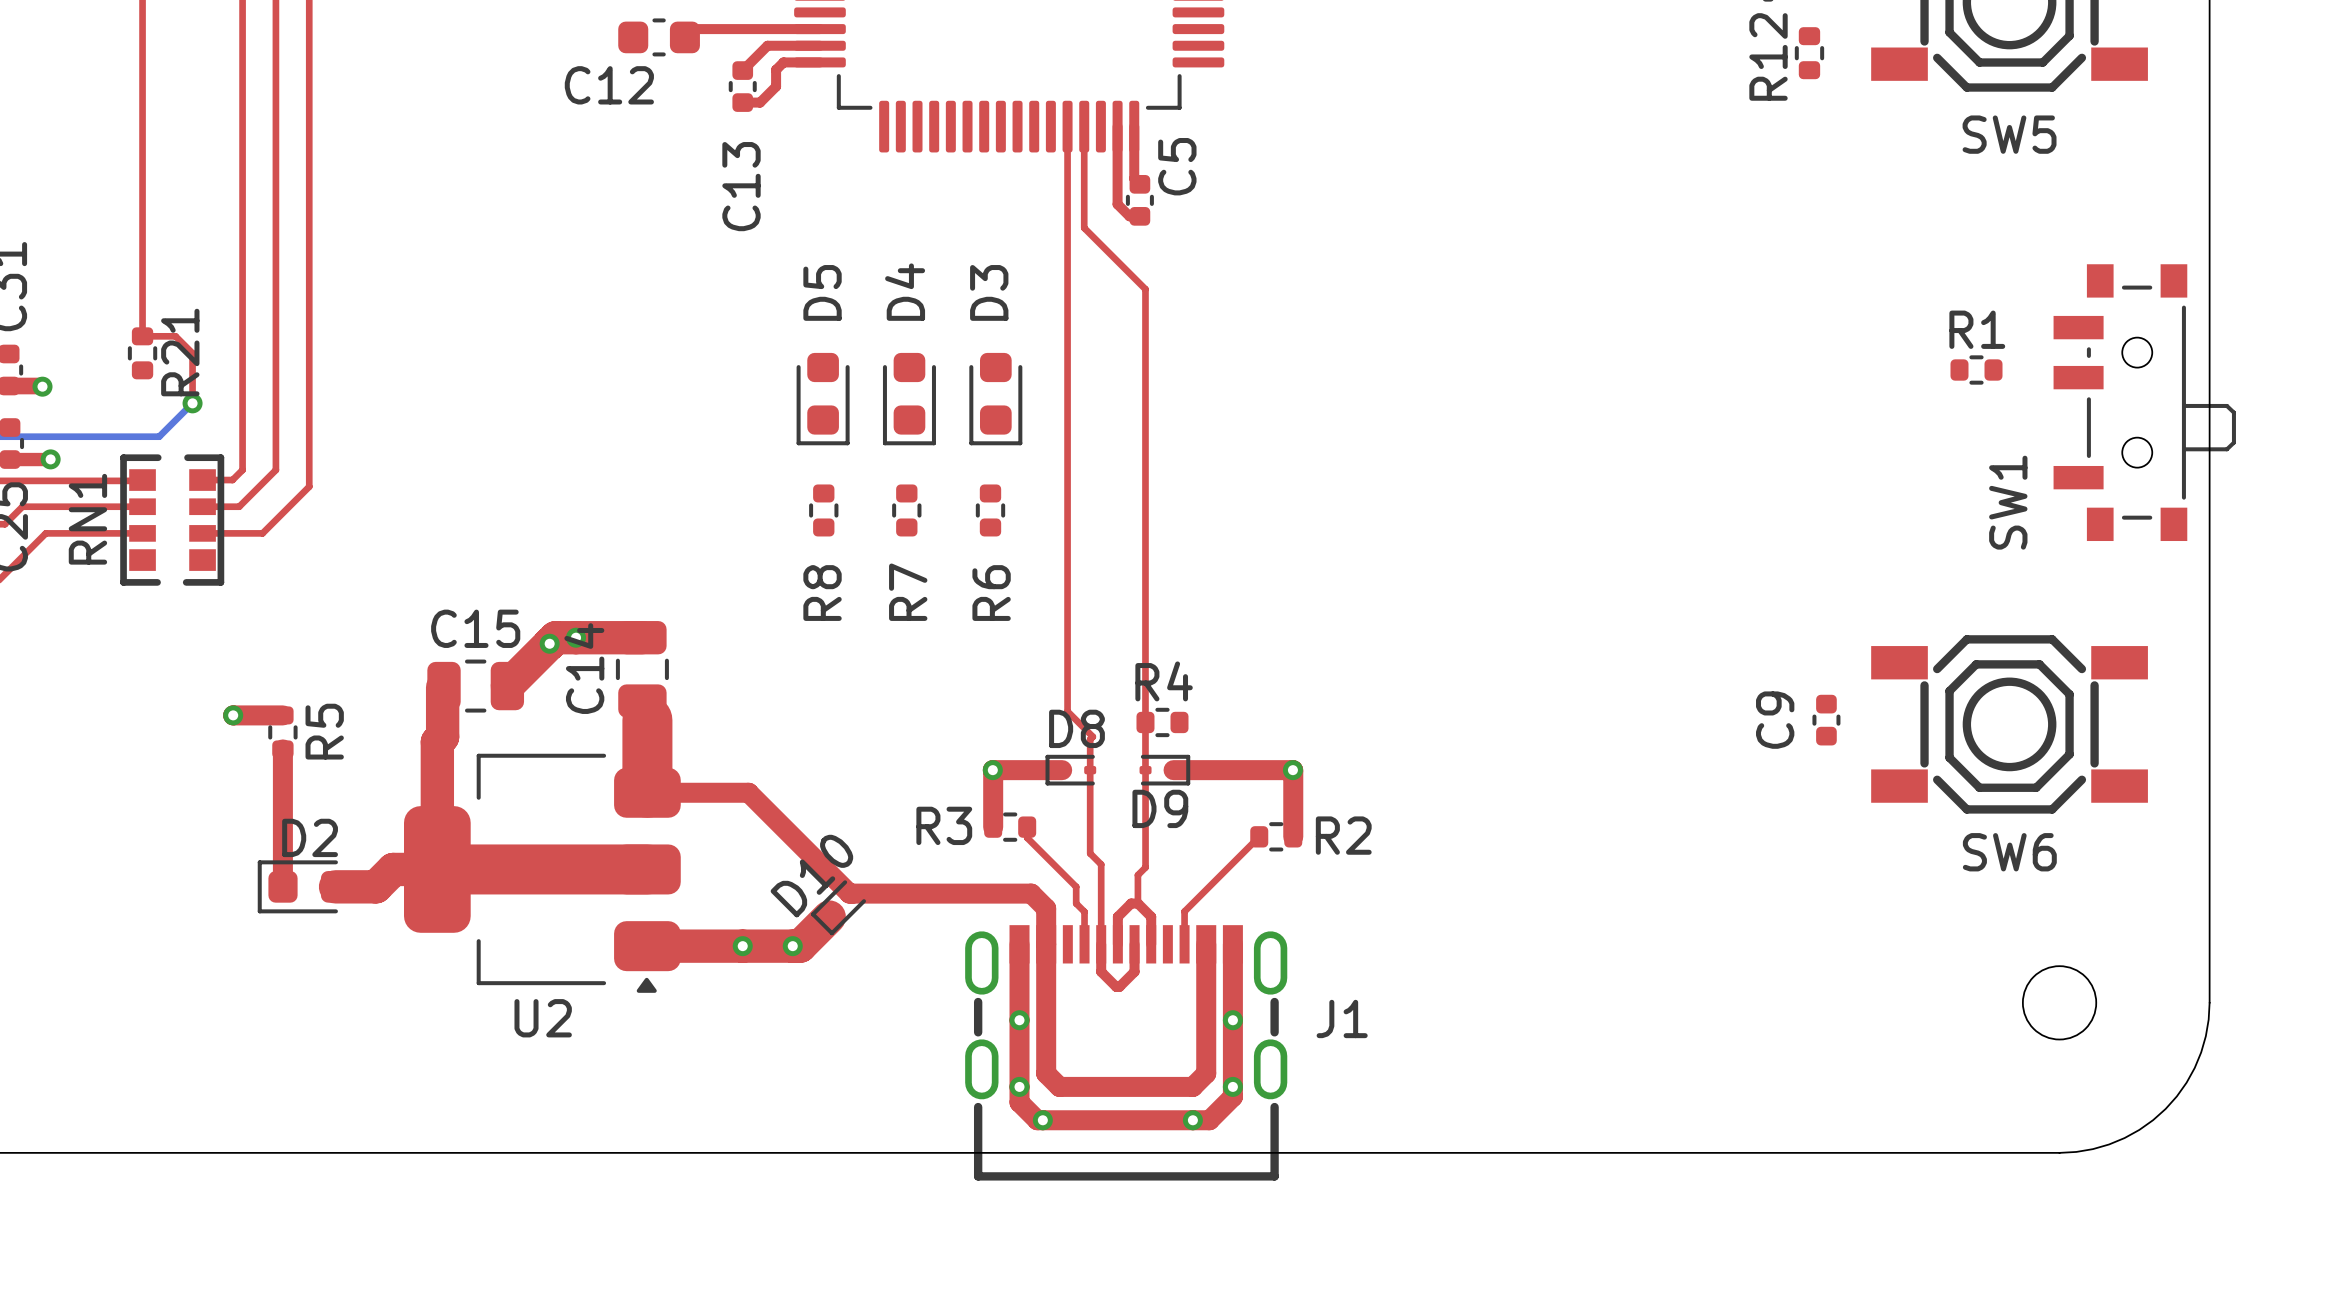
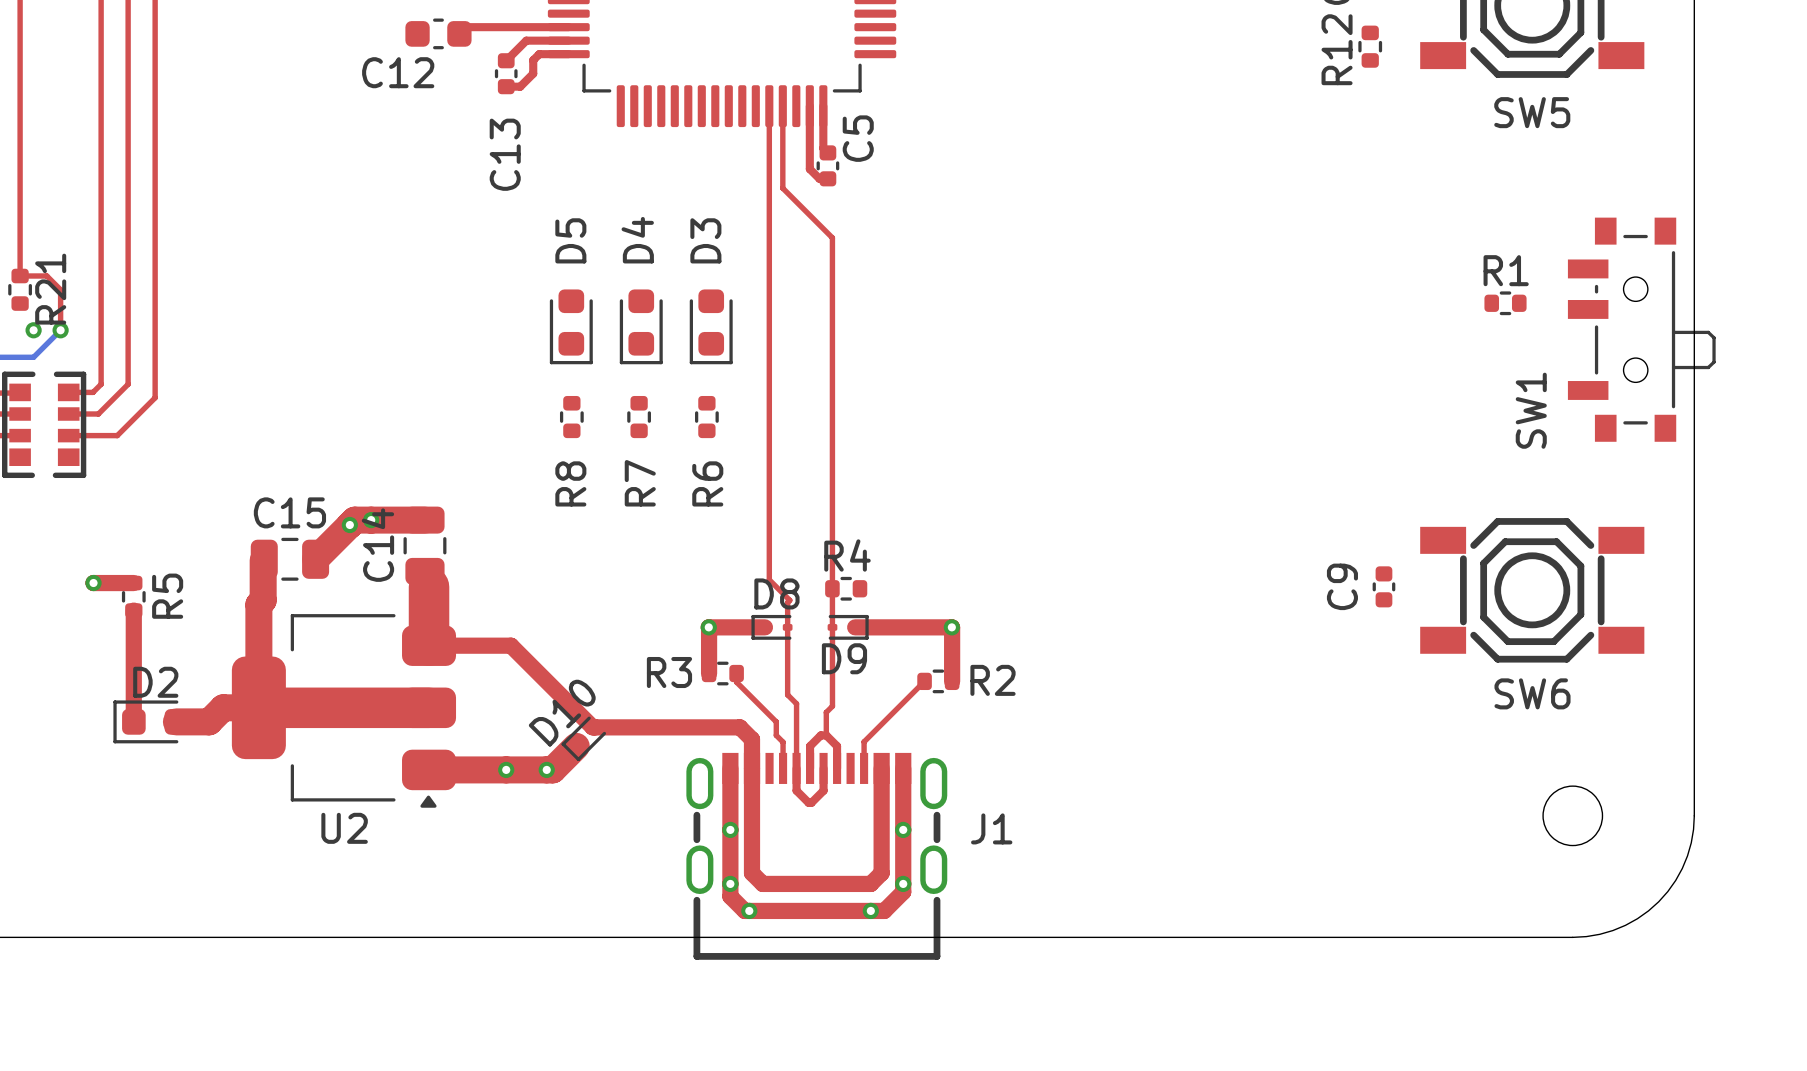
via: none -> (33, 330)

